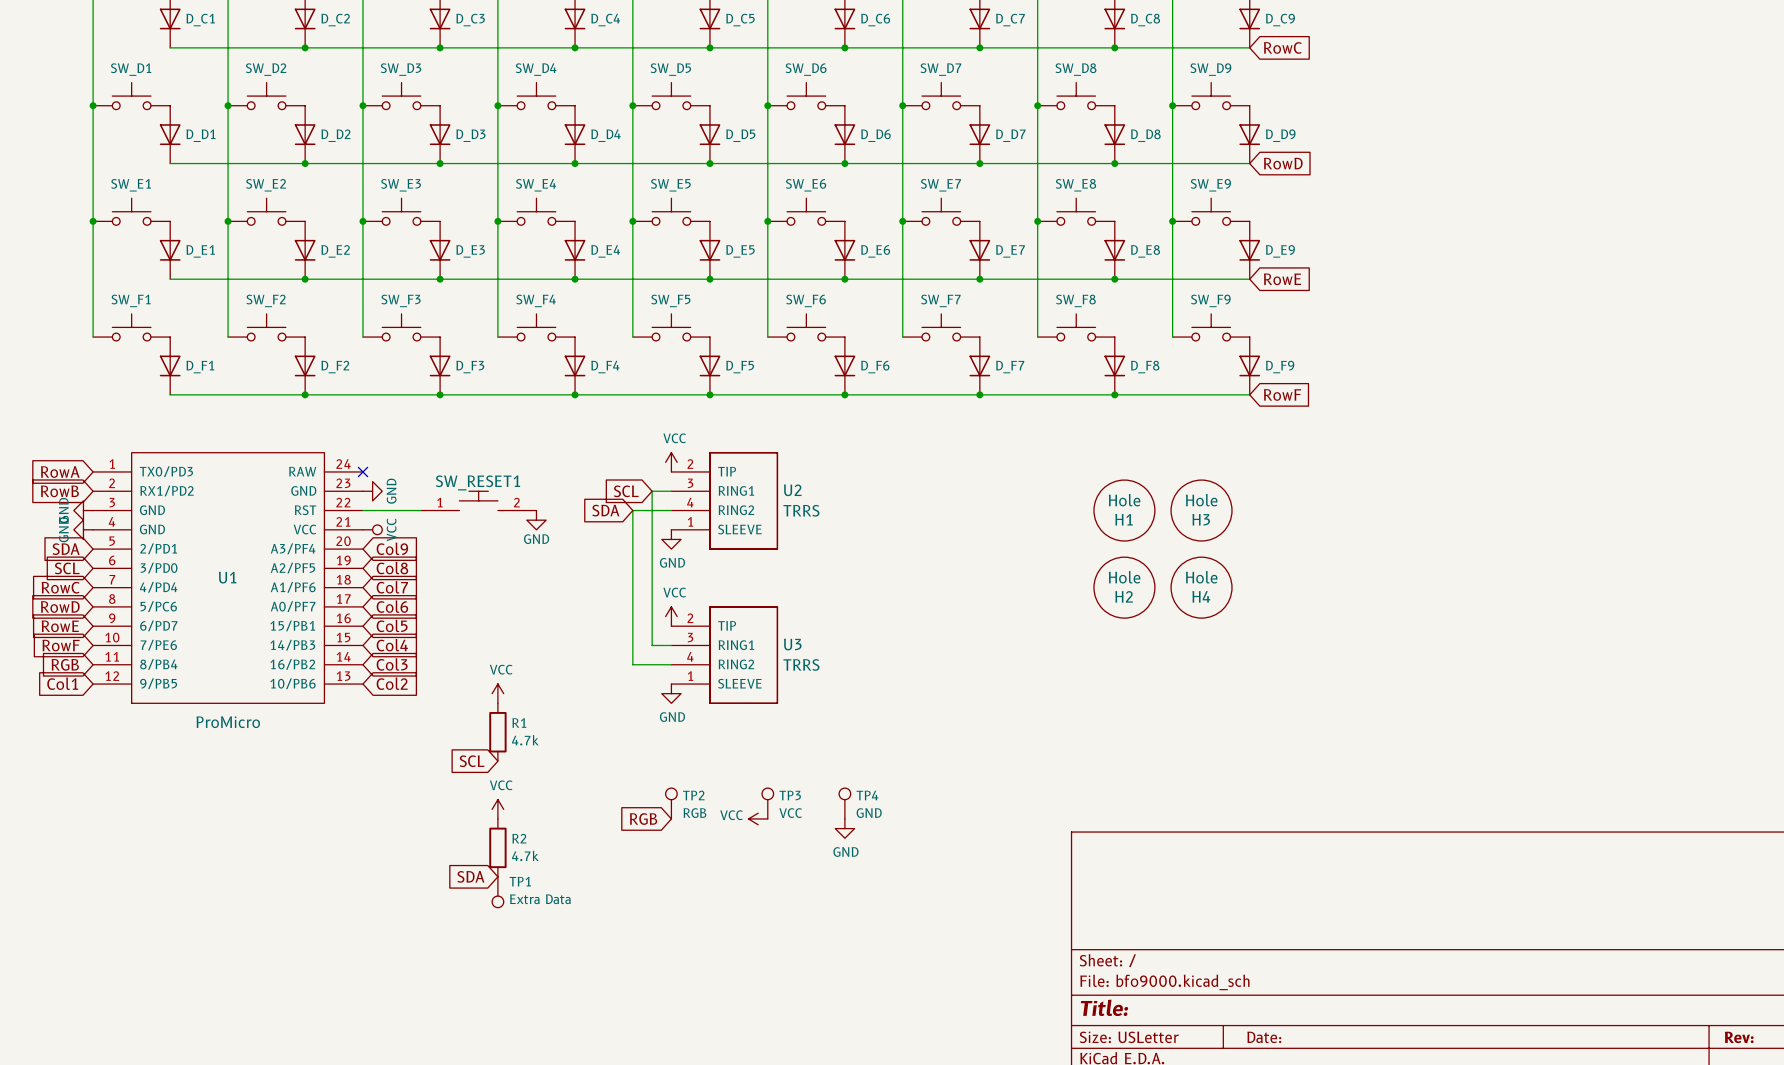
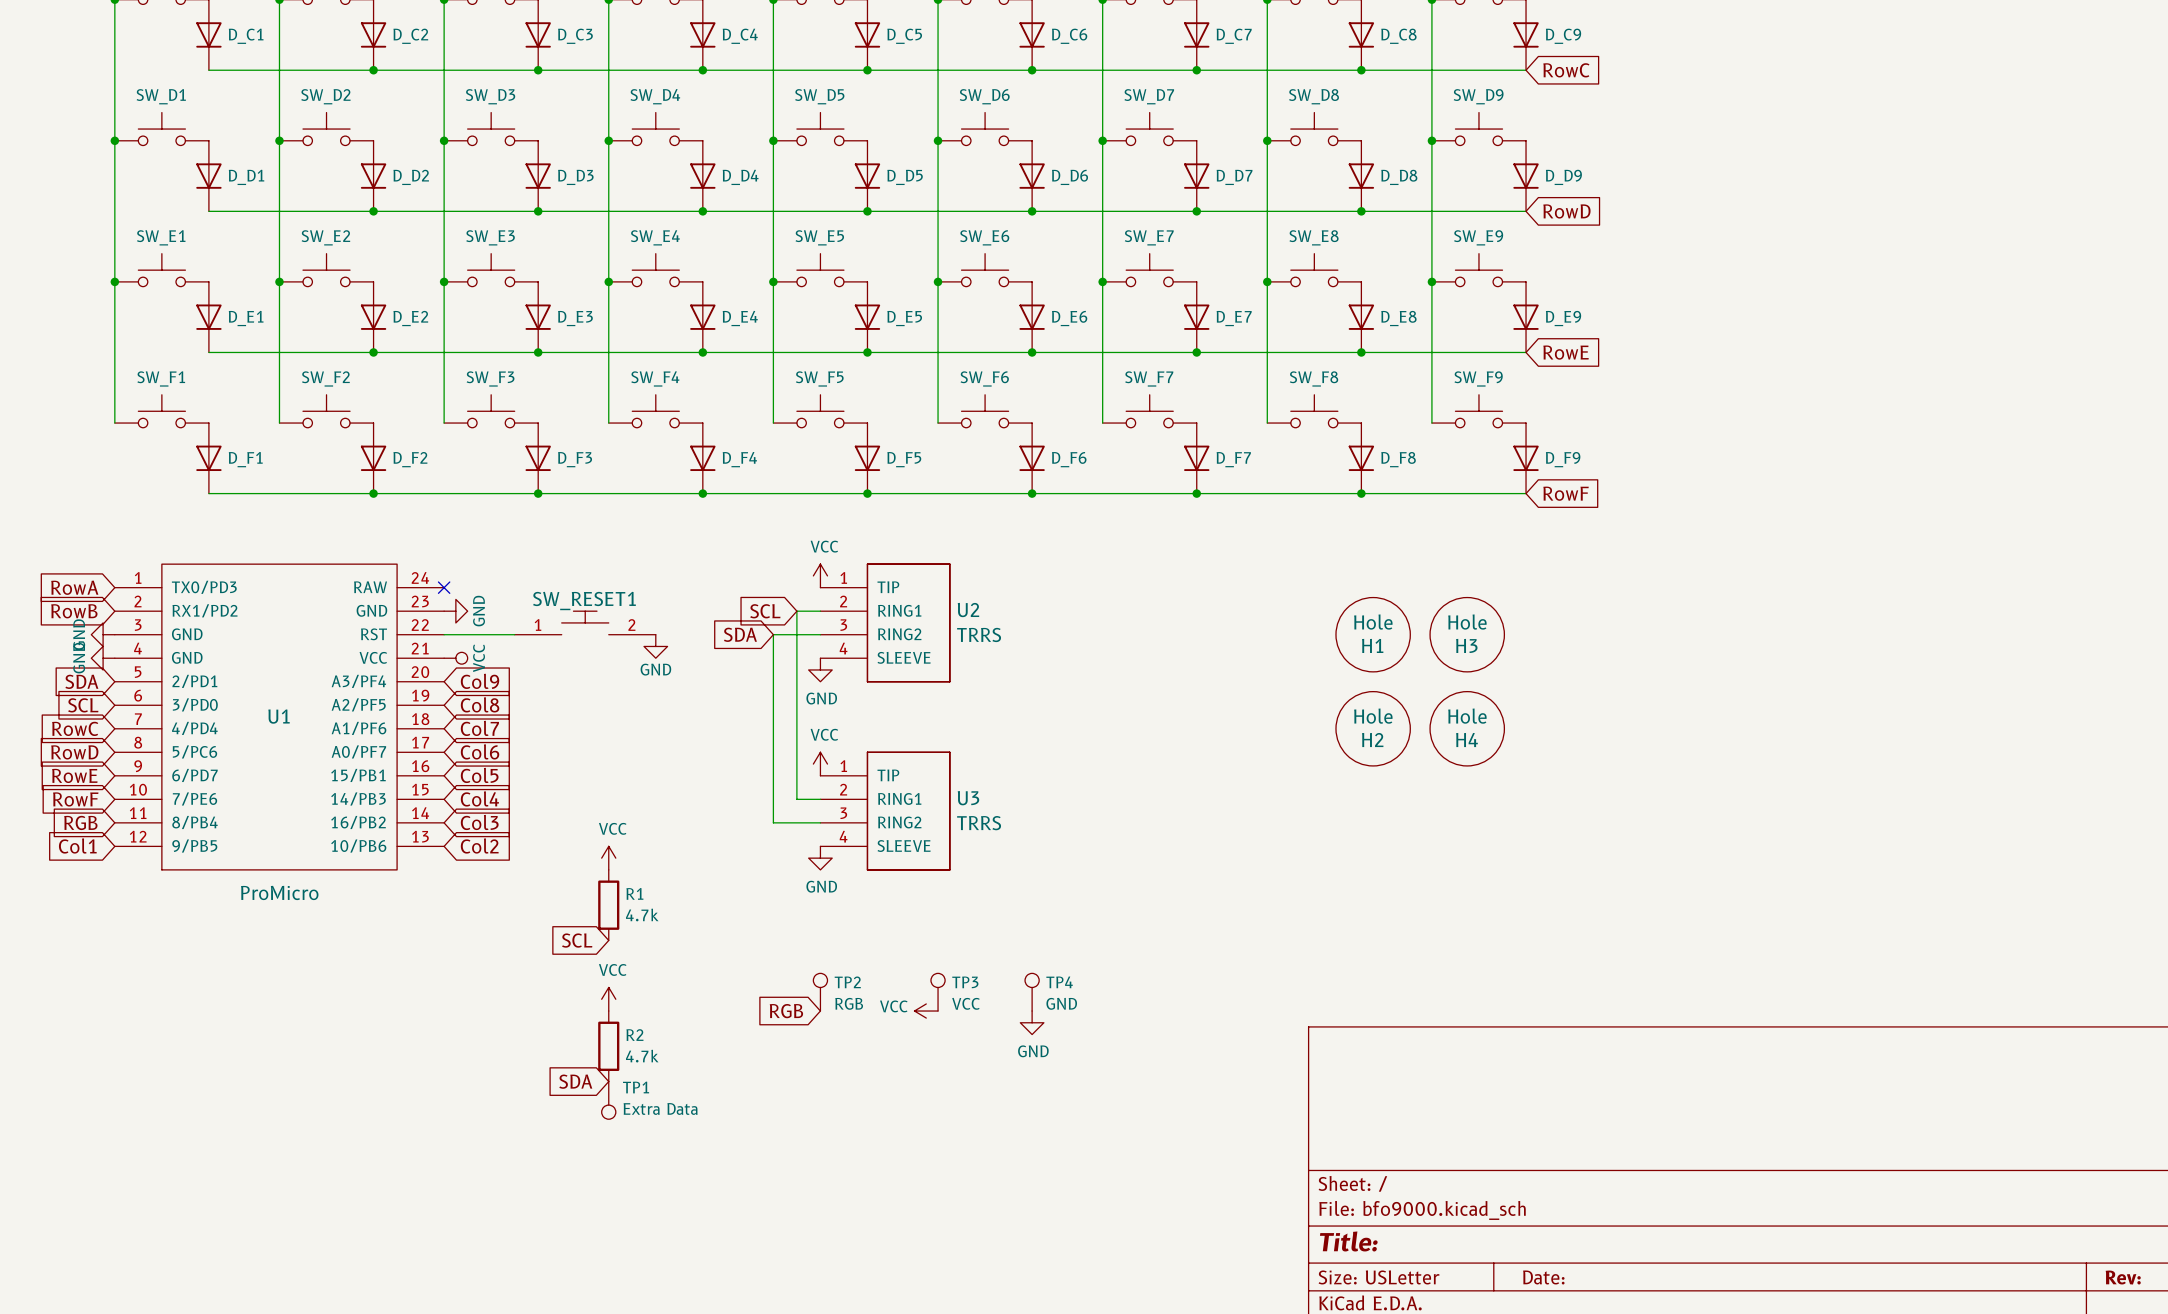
U2 pin number: 2 (690, 464) -> 1 (843, 577)
U2 pin number: 3 (690, 483) -> 2 (843, 601)
U2 pin number: 4 (690, 502) -> 3 (843, 625)
U2 pin number: 1 (690, 521) -> 4 (843, 648)
U3 pin number: 2 (690, 618) -> 1 (843, 766)
U3 pin number: 3 (690, 637) -> 2 (843, 789)
U3 pin number: 4 (690, 656) -> 3 (843, 813)
U3 pin number: 1 (690, 676) -> 4 (843, 836)

